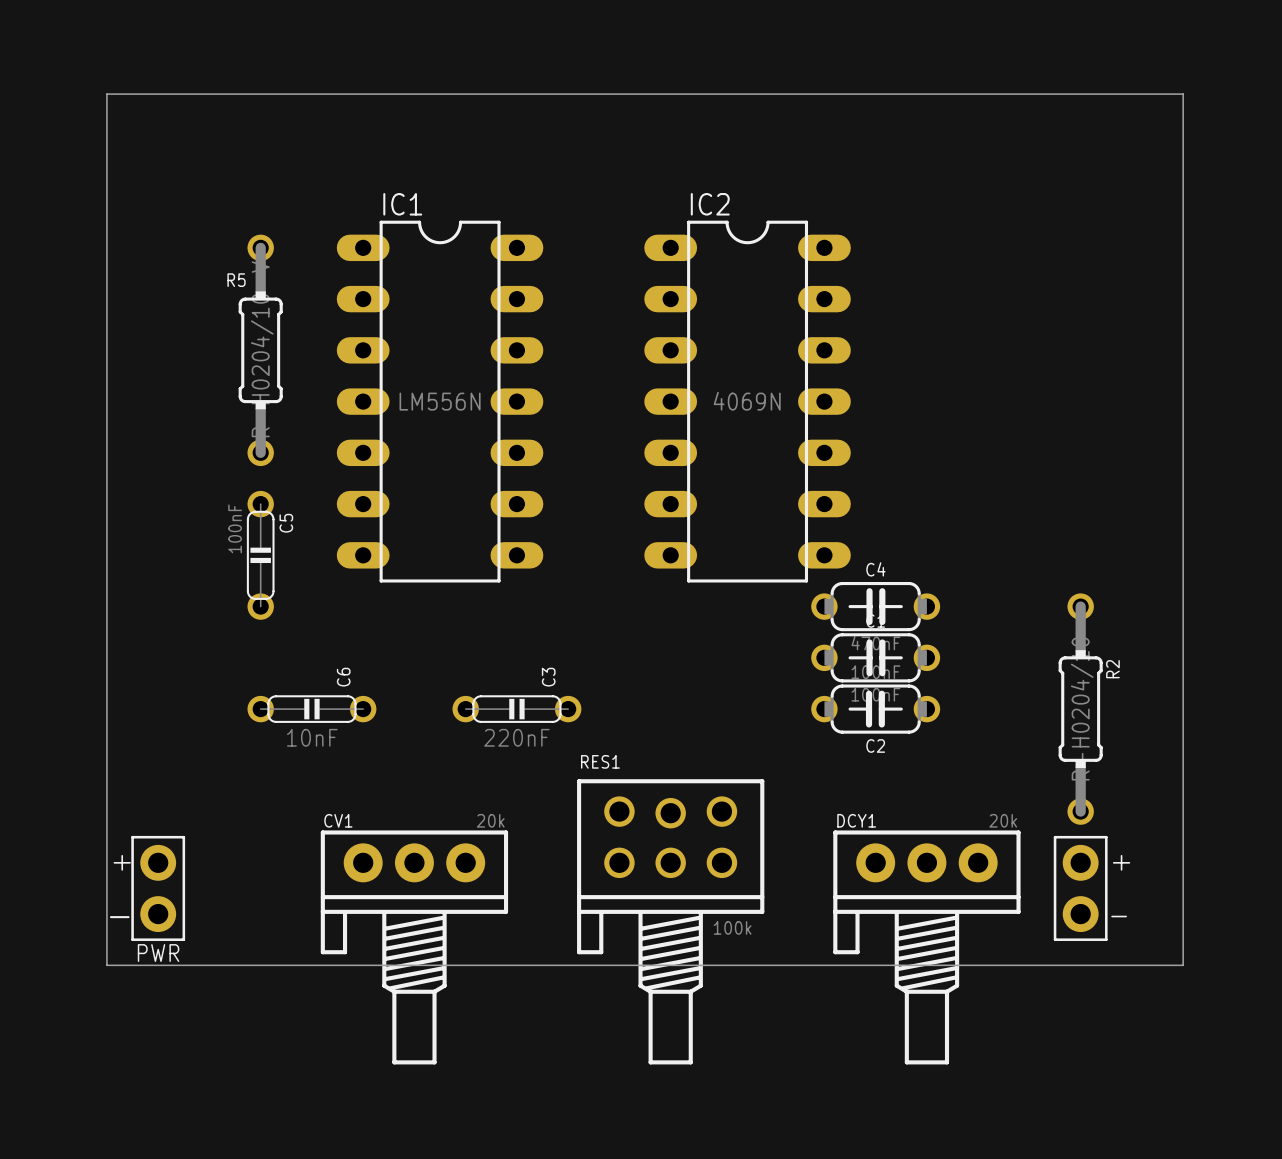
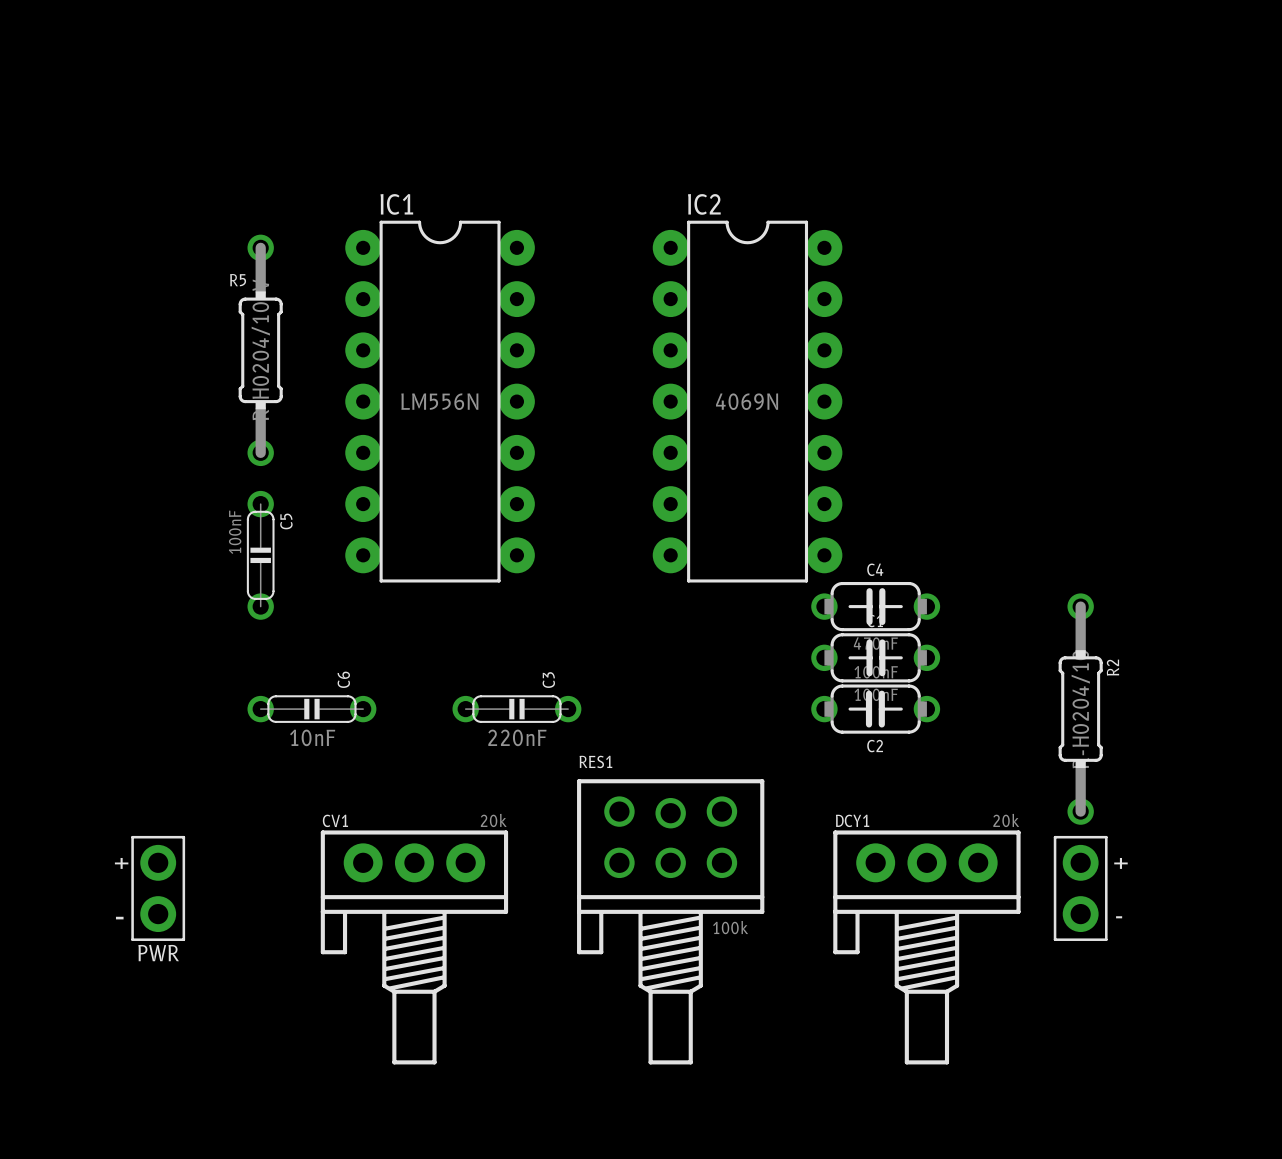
board edge: (106, 94) (1183, 94) (1183, 965) (106, 965) (106, 94) -> none
IC1 footprint: [336, 220, 544, 583] -> [345, 220, 535, 583]
IC2 footprint: [644, 220, 851, 583] -> [652, 220, 843, 583]

